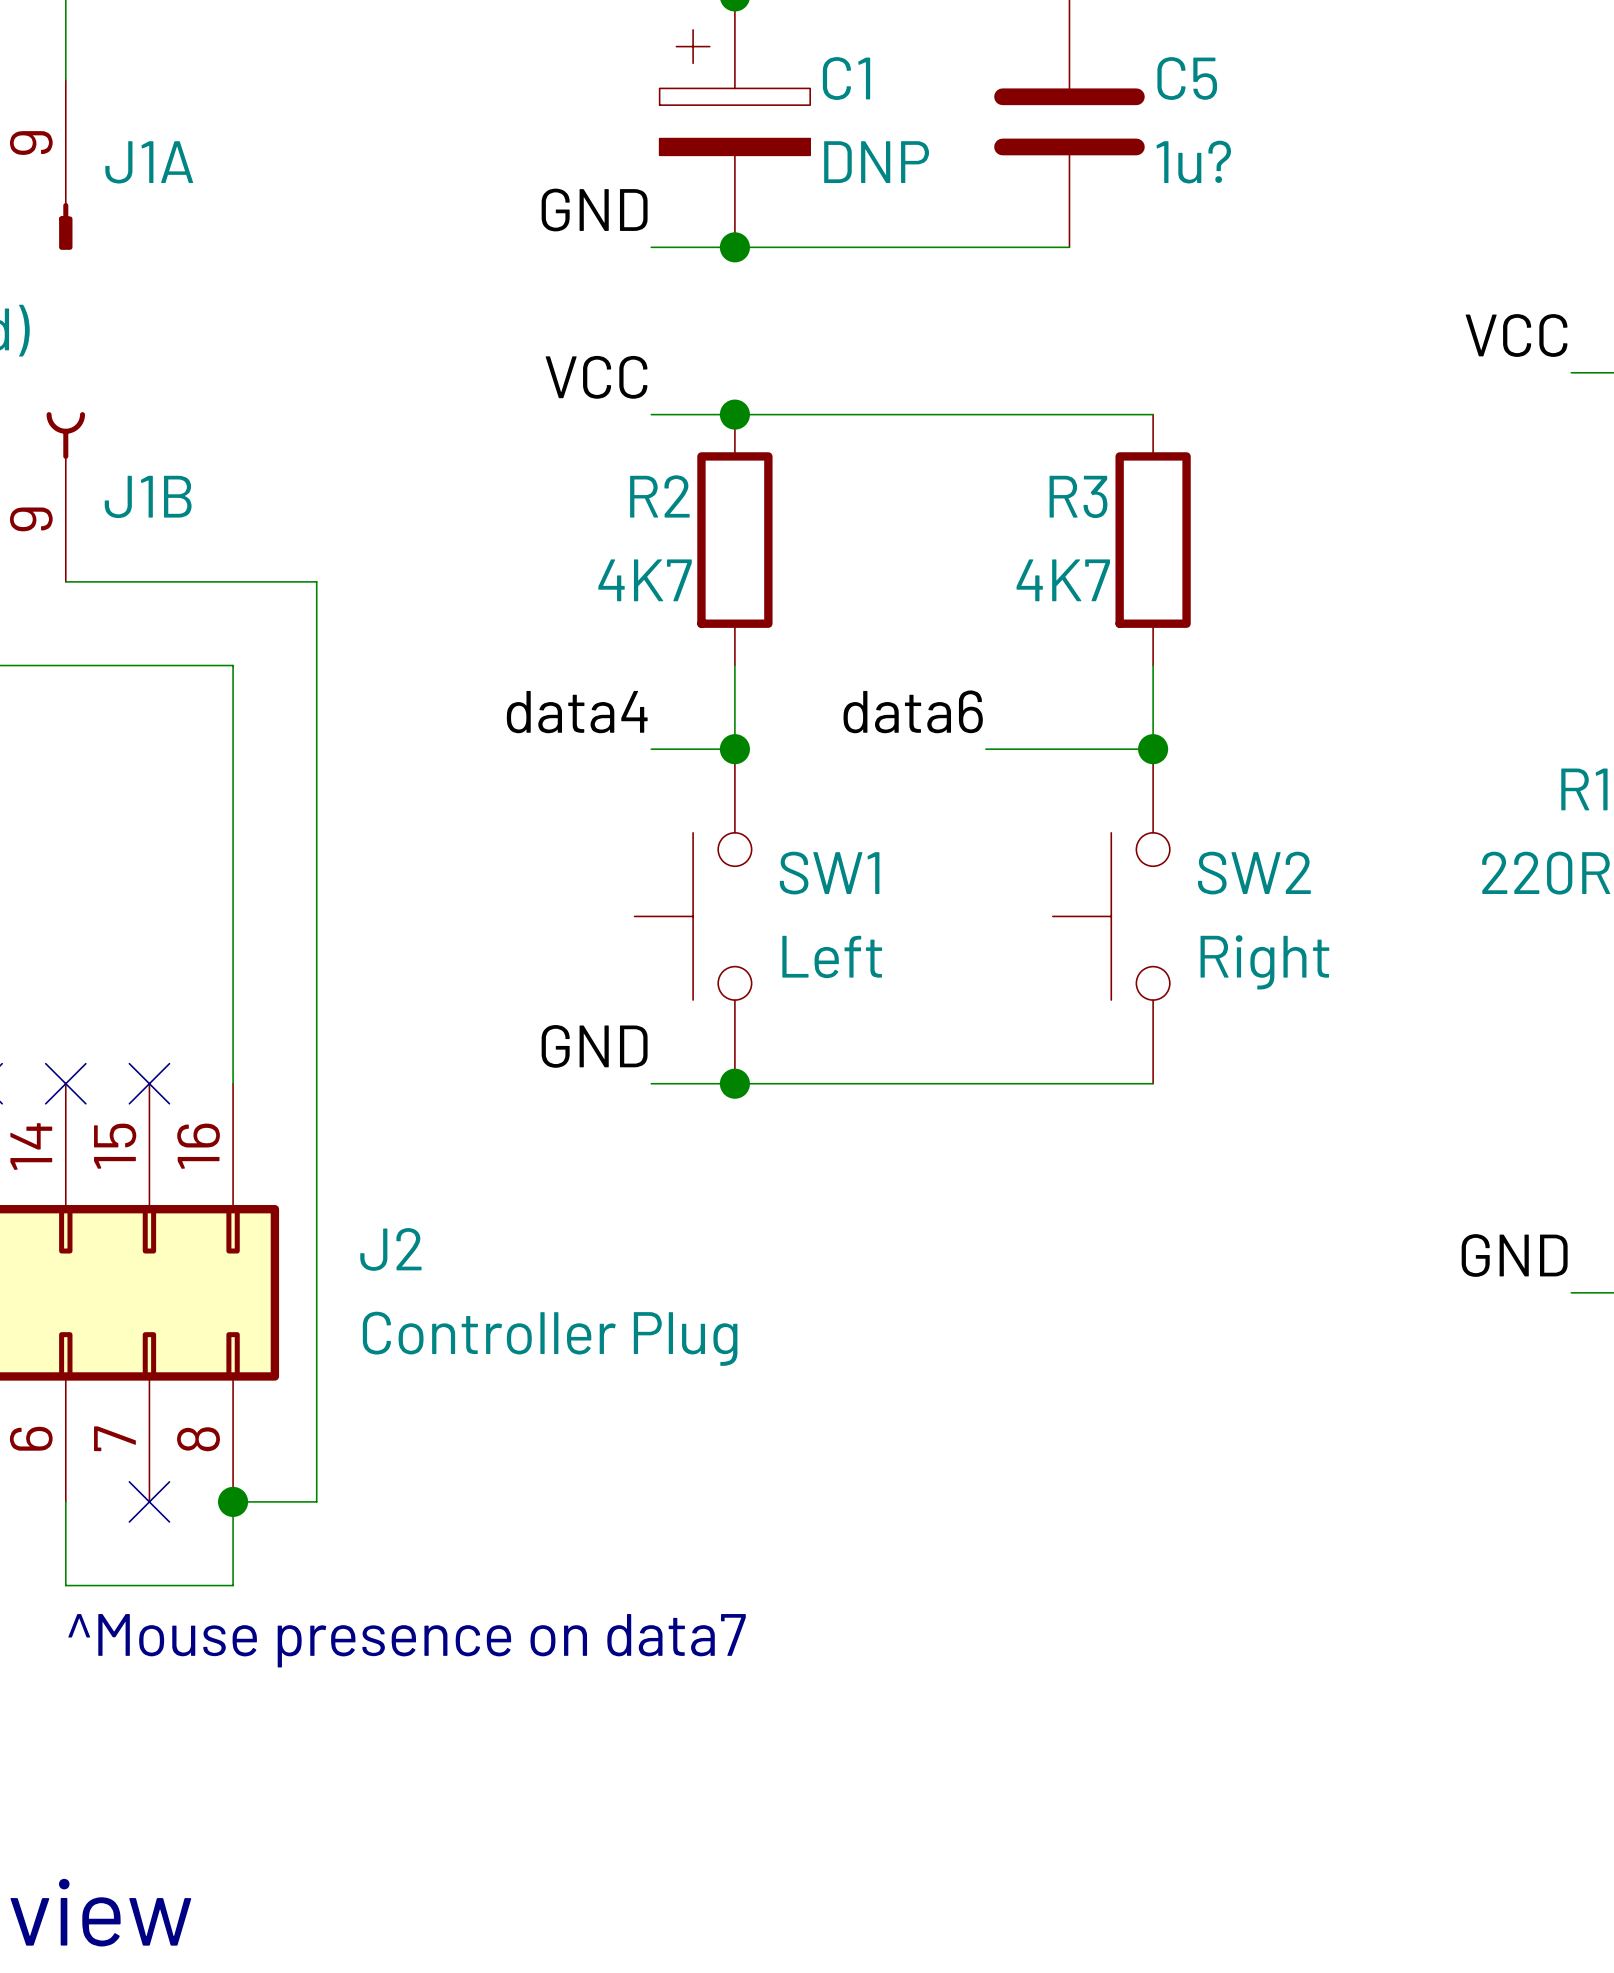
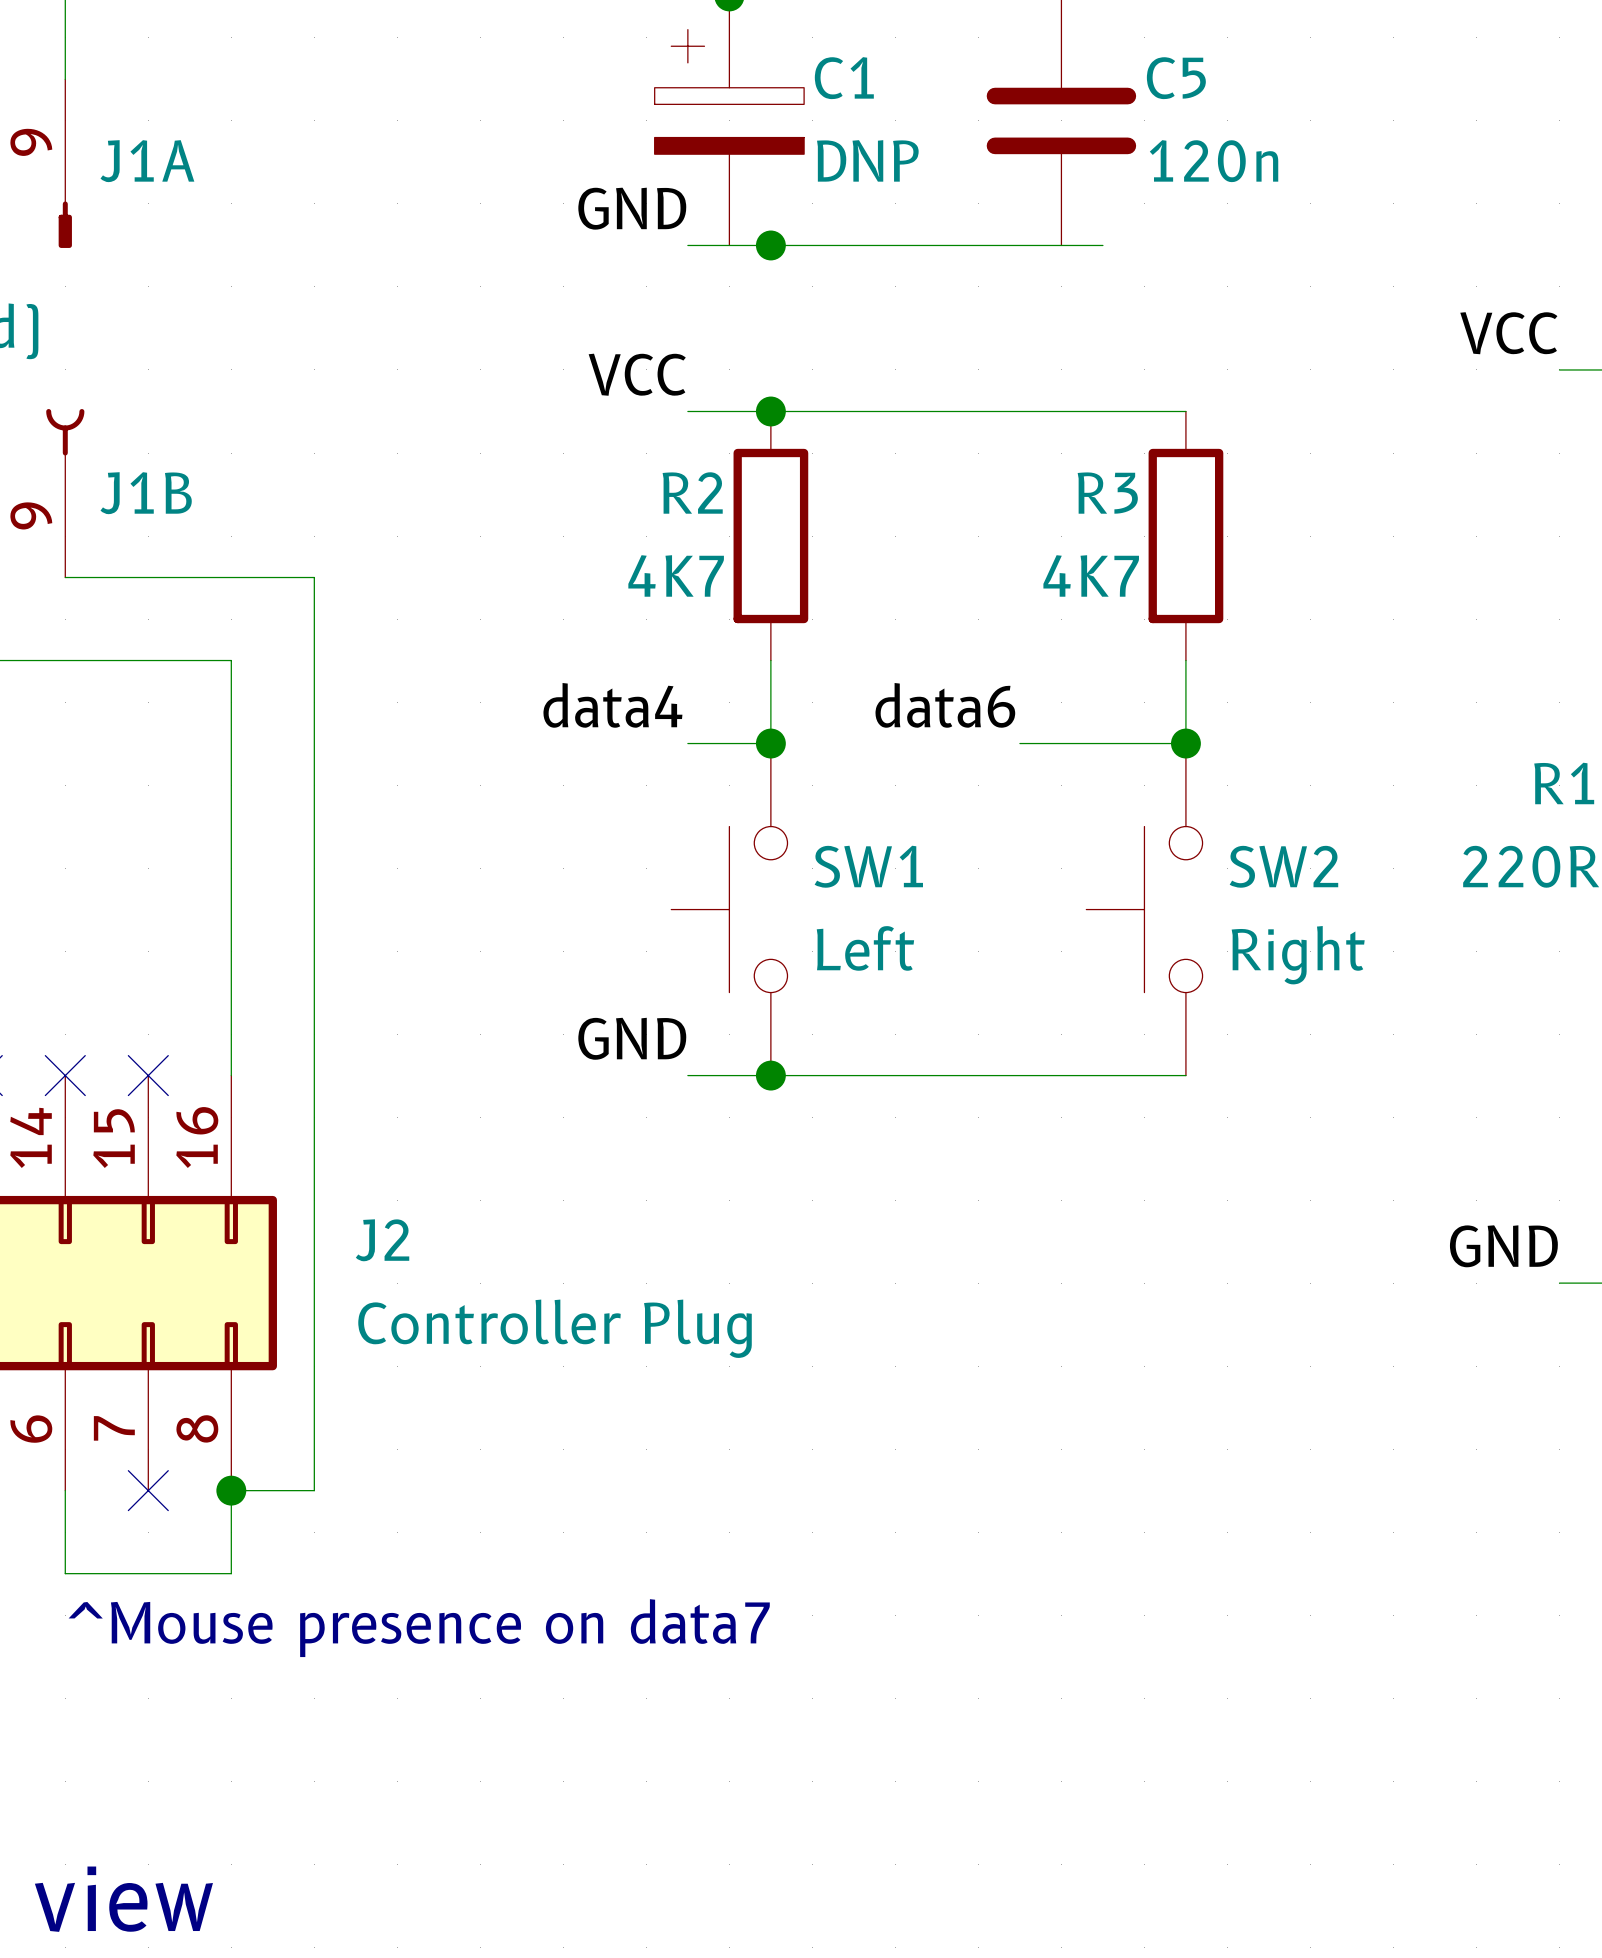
C5 value: 1u? (1193, 162) -> 120n (1214, 161)
label position: GND (594, 210) -> GND (632, 208)
wire: (651, 247) (693, 247) -> (1061, 245) (1102, 245)
junction position: (734, 247) -> (770, 245)
label position: VCC (596, 377) -> VCC (637, 374)
wire: (651, 414) (693, 414) -> (1144, 411) (1185, 411)
junction position: (734, 414) -> (770, 411)
R2 position: (734, 540) -> (770, 536)
R3 position: (1153, 540) -> (1185, 536)
wire: (734, 665) (734, 749) -> (770, 660) (770, 743) (729, 743)
wire: (1153, 665) (1153, 749) -> (1185, 660) (1185, 743) (1144, 743)
label position: data6 (913, 711) -> data6 (945, 705)
label position: data4 (577, 712) -> data4 (612, 705)
wire: (651, 749) (693, 749) -> none
junction position: (734, 749) -> (770, 743)
wire: (985, 749) (1027, 749) -> none
junction position: (1153, 749) -> (1185, 743)
SW1 position: (693, 916) -> (729, 909)
SW2 position: (1111, 916) -> (1144, 909)
label position: GND (594, 1046) -> GND (632, 1038)
wire: (651, 1083) (693, 1083) -> (1144, 1075) (1185, 1075)
junction position: (734, 1083) -> (770, 1075)

